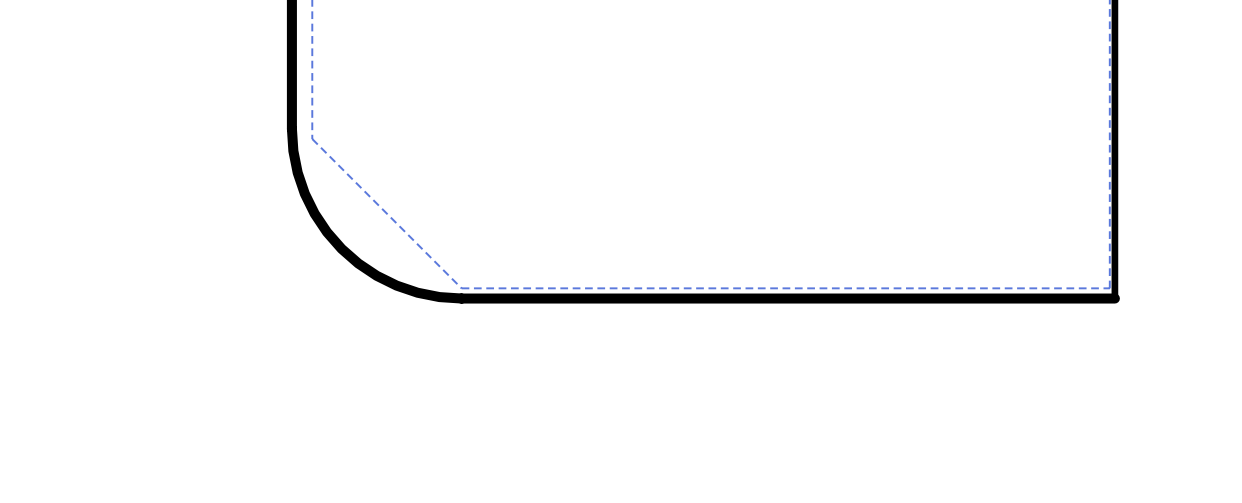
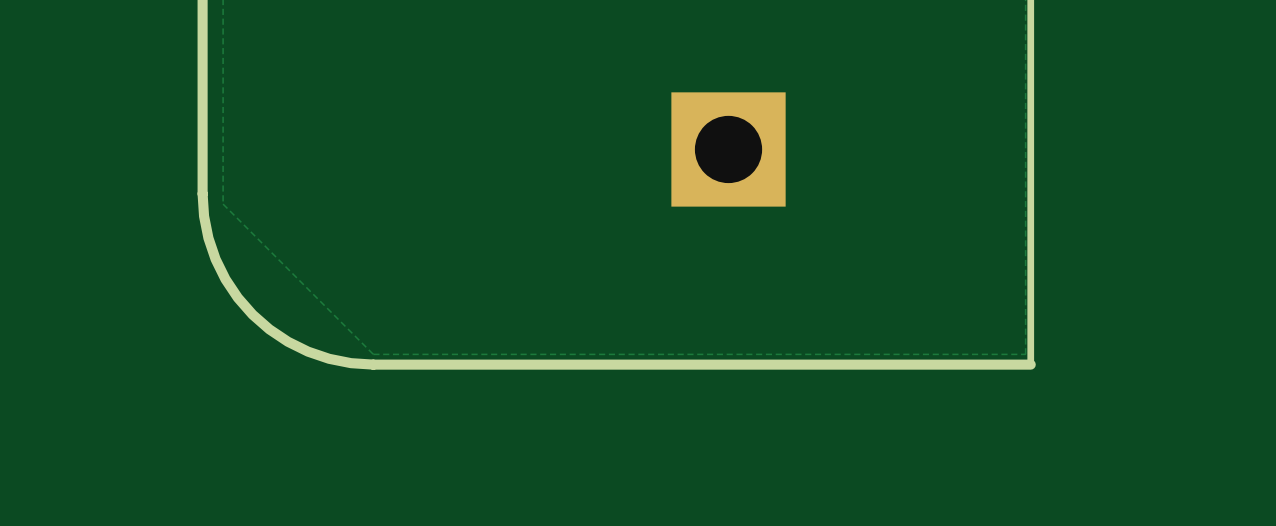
part: none -> (728, 149)

